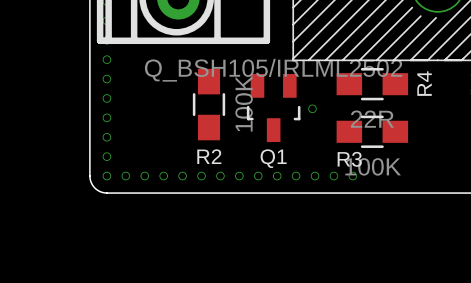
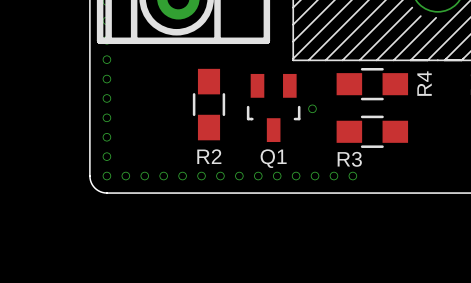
Q1 value: Q_BSH105/IRLML2502 (273, 70) -> none
R2 value: 100K (244, 103) -> none
R4 value: 22R (372, 119) -> none
R3 value: 100K (373, 166) -> none

